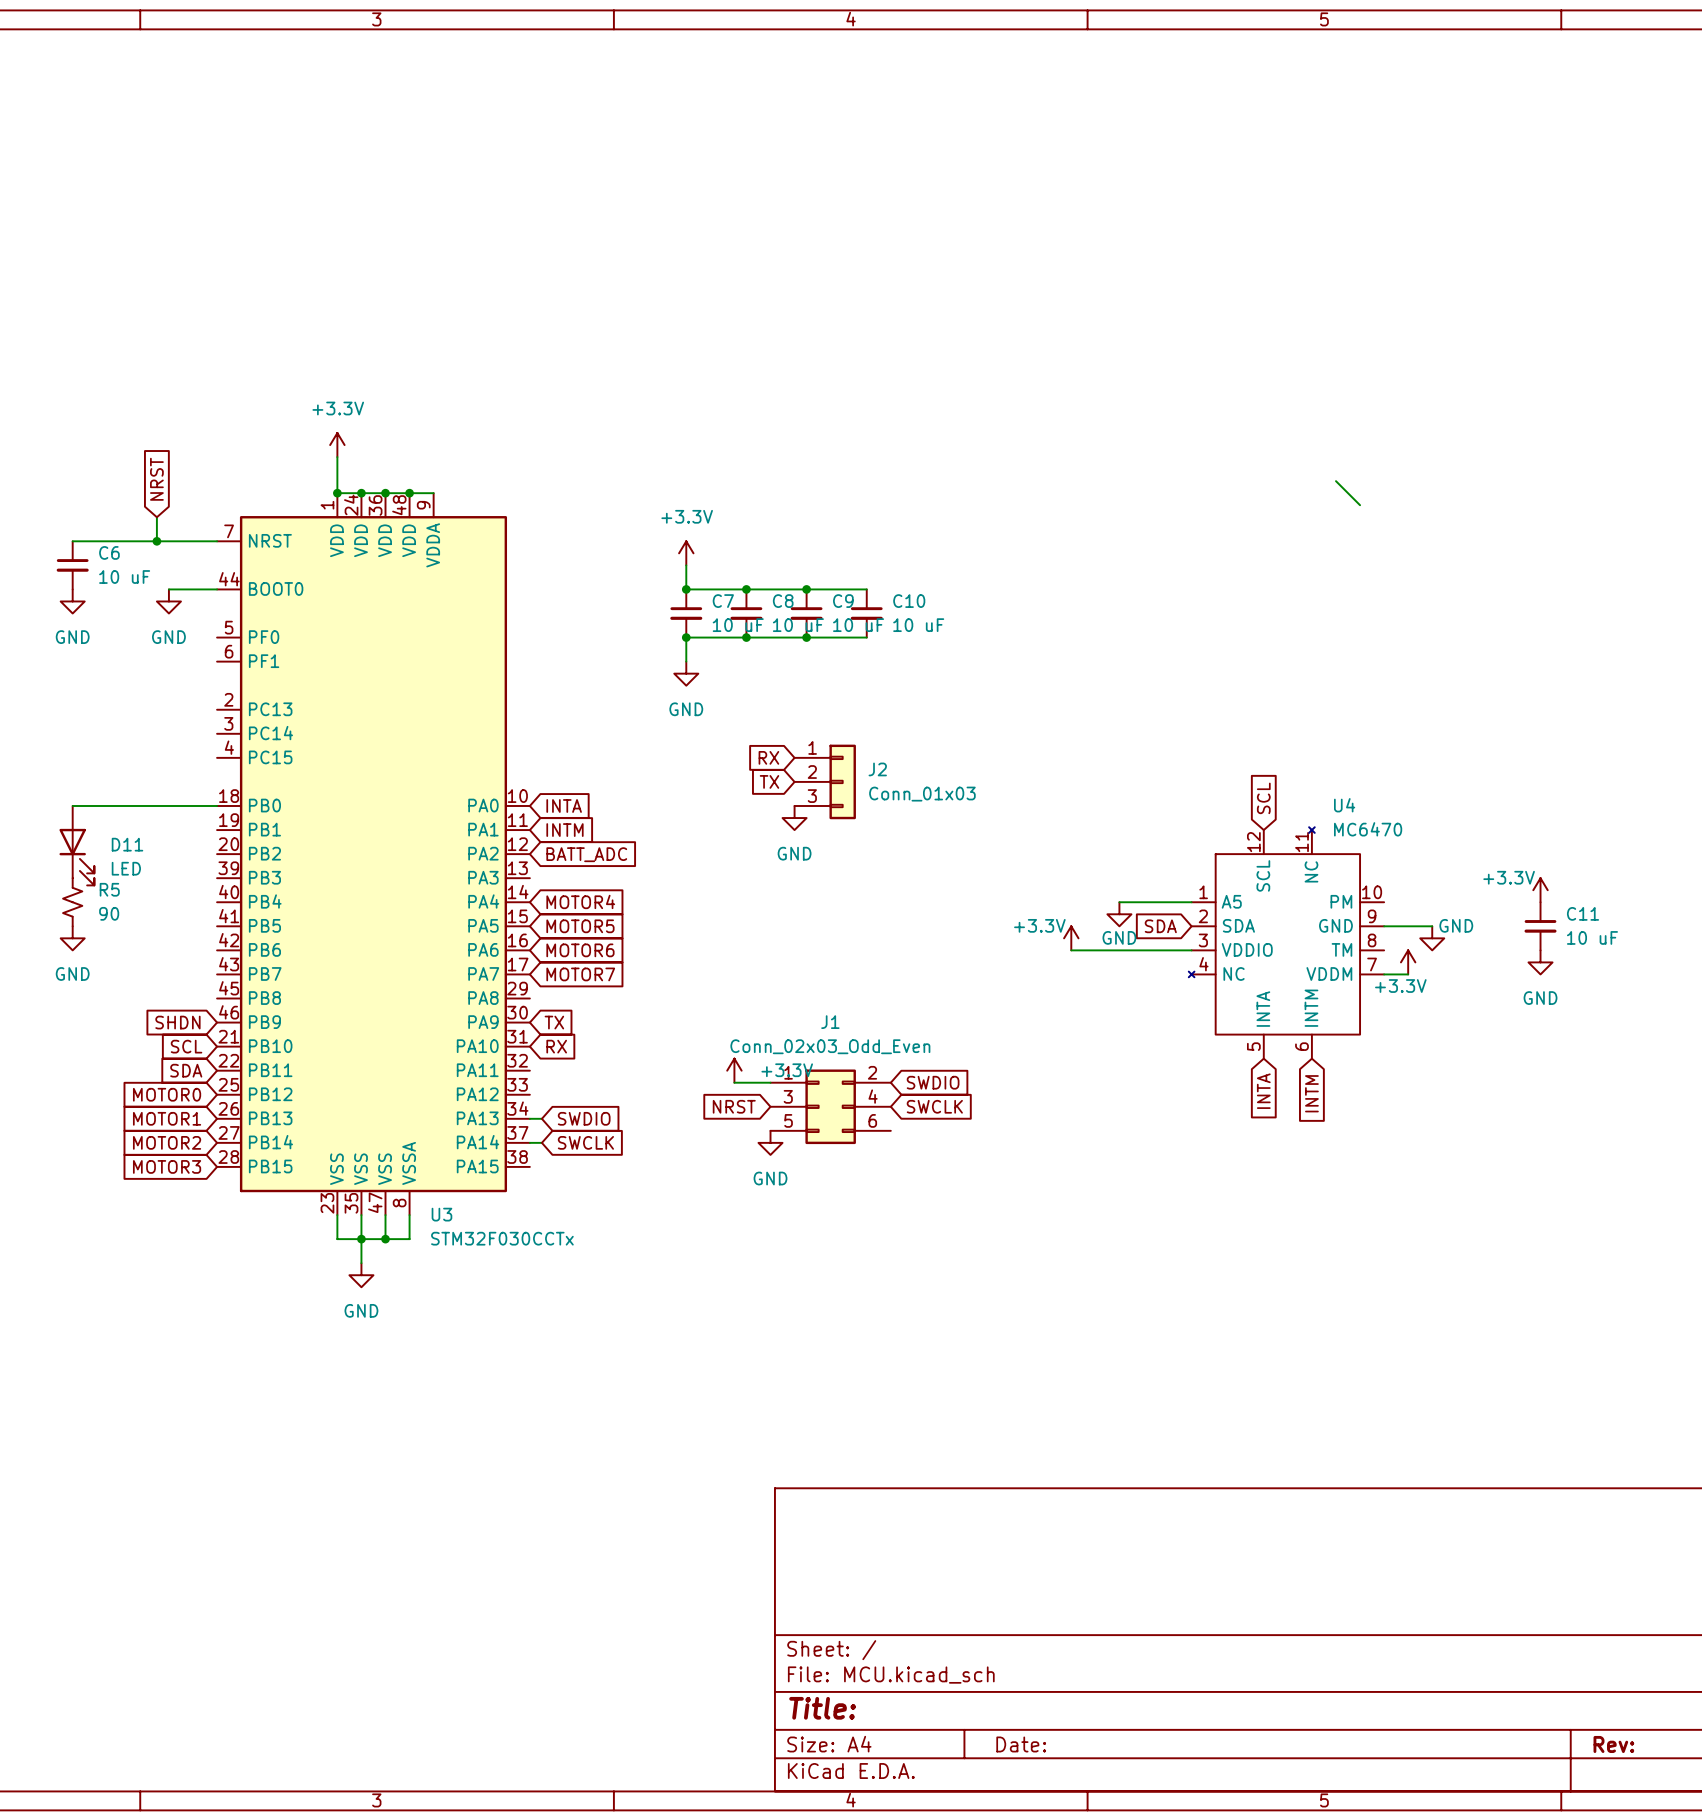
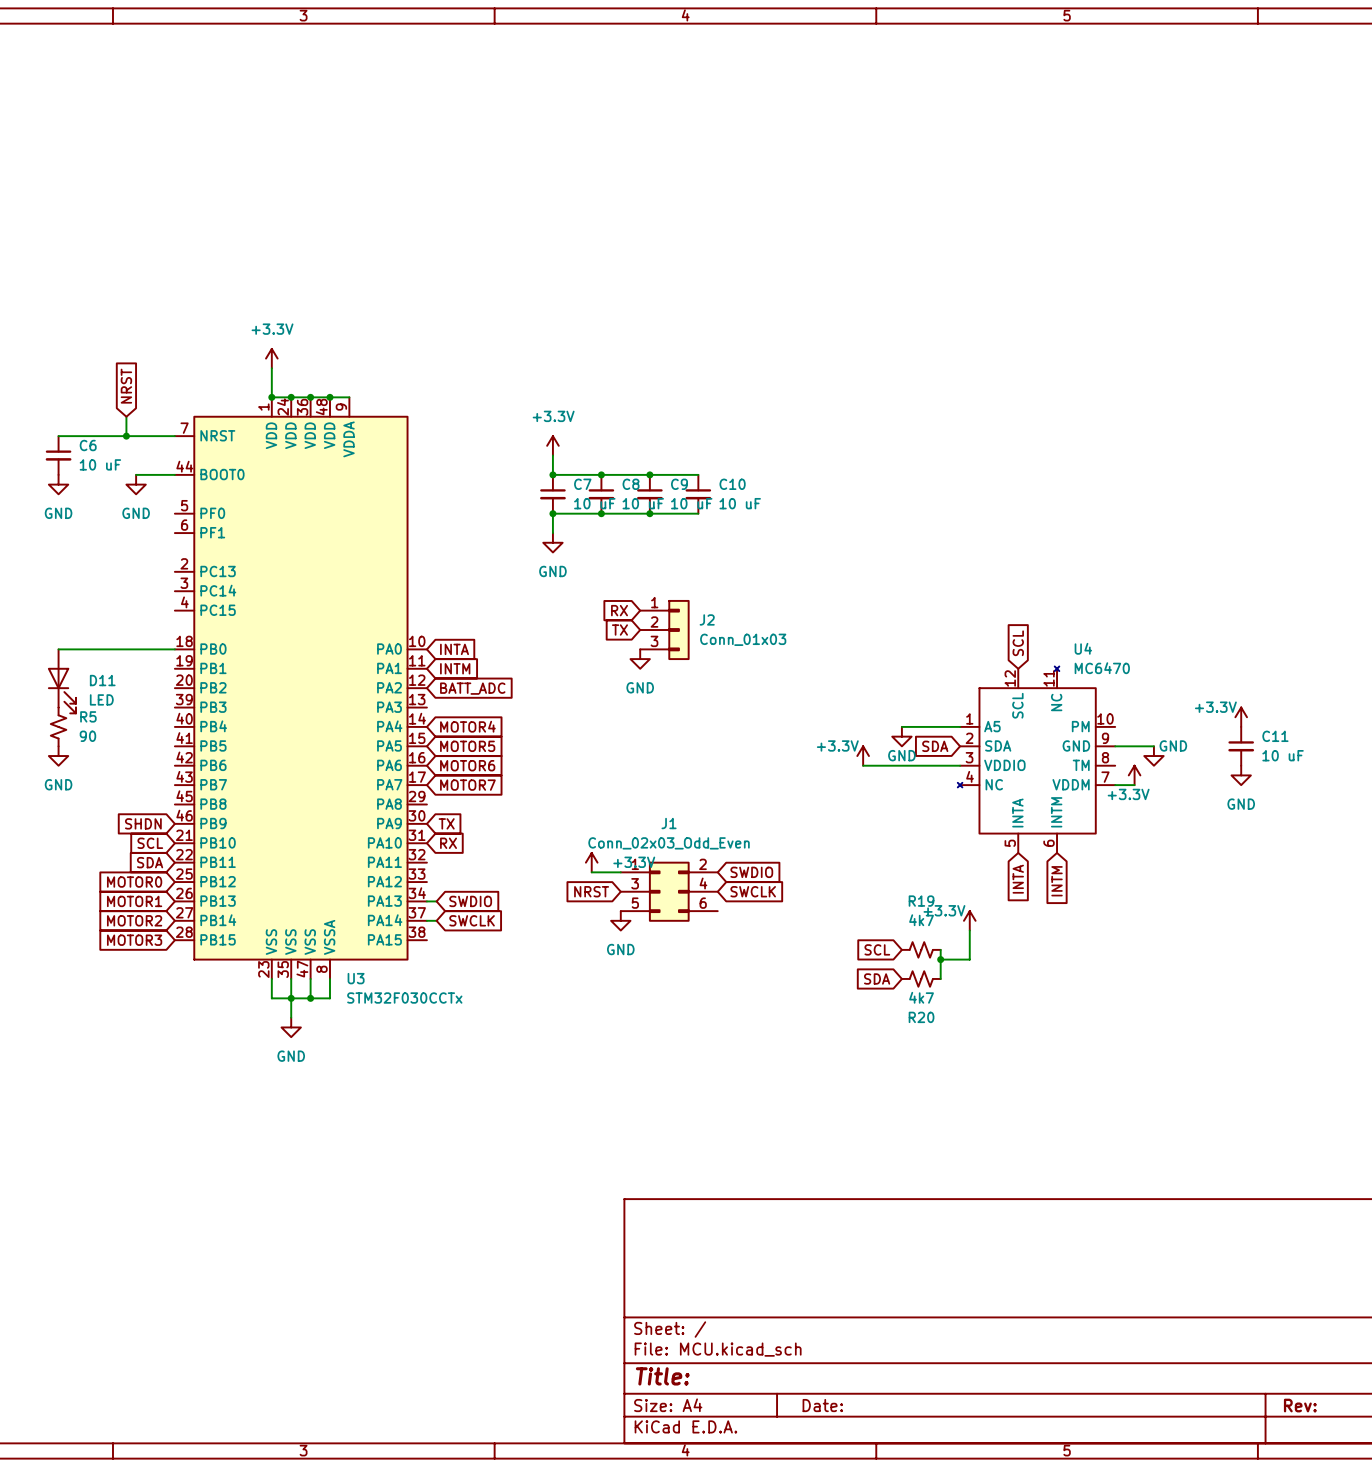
wire: (1335, 481) (1360, 505) -> none
power symbol: none -> +3.3V (969, 920)
wire: none -> (969, 930) (969, 959) (940, 959)
global label: none -> SCL (877, 949)
R19: none -> 4k7 (921, 949)
wire: none -> (940, 949) (940, 978)
junction: none -> (940, 959)
global label: none -> SDA (877, 978)
R20: none -> 4k7 (921, 978)

